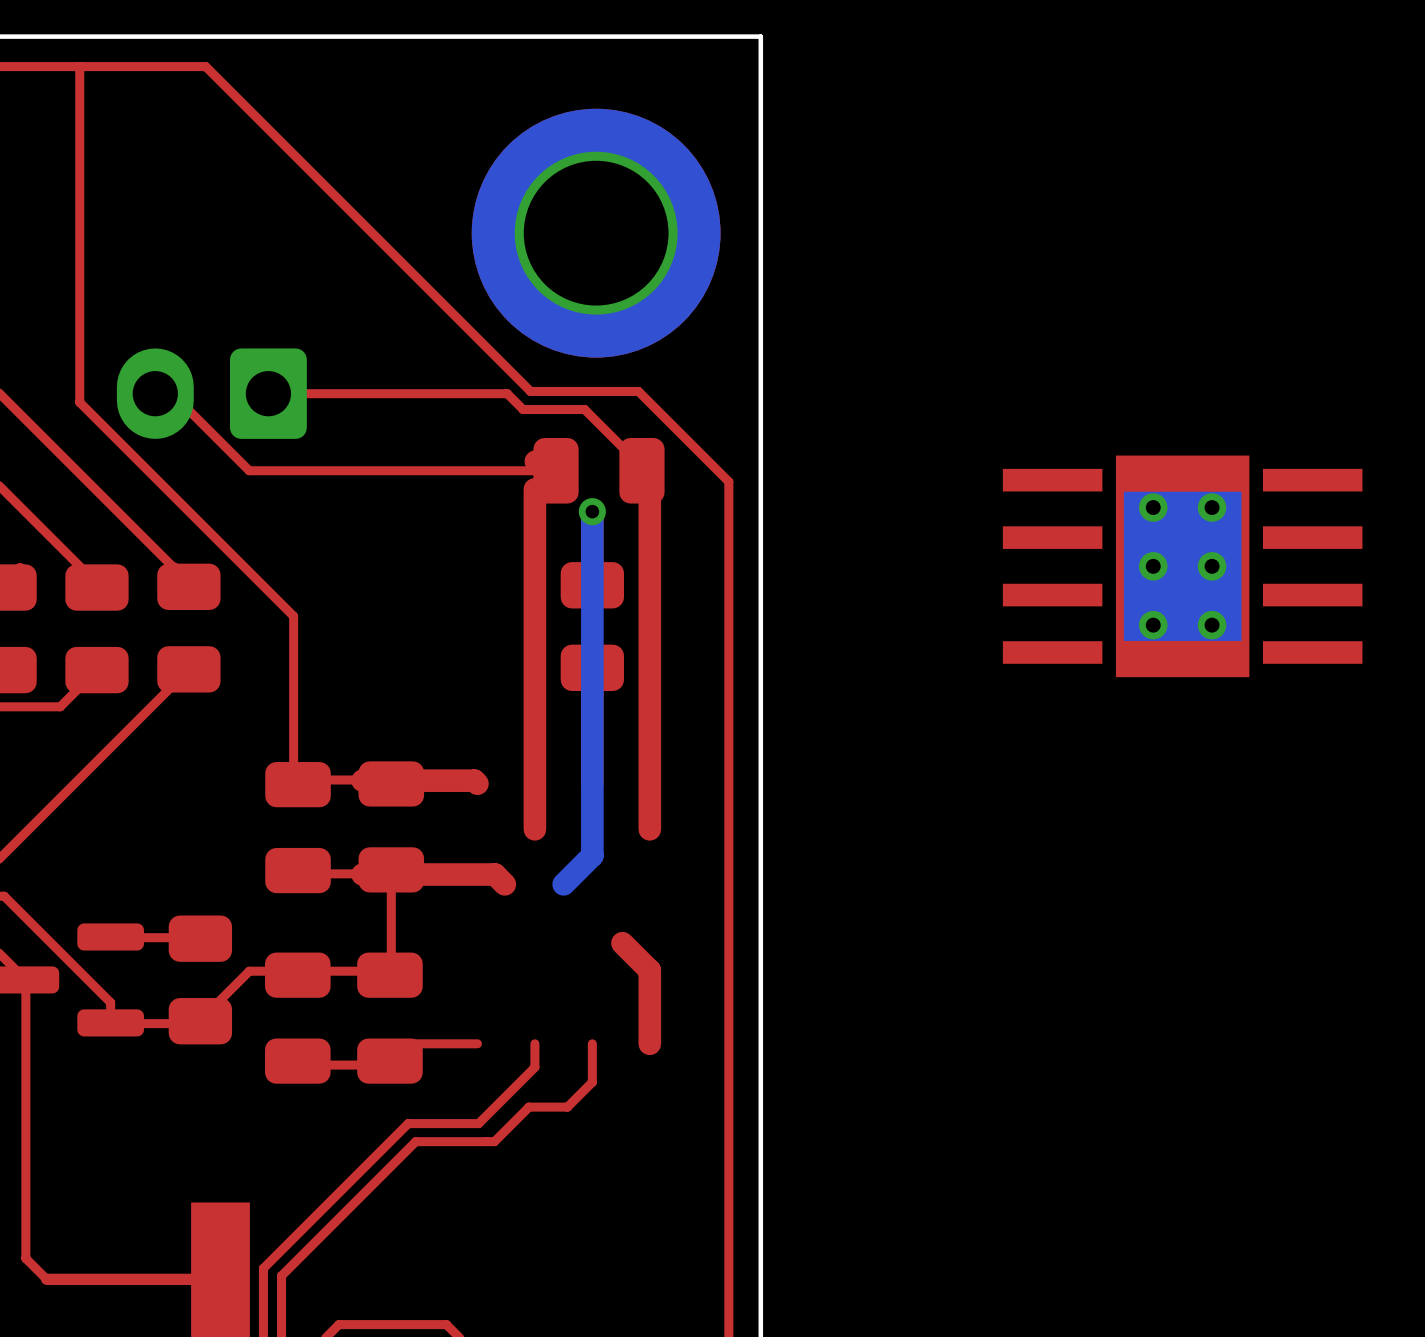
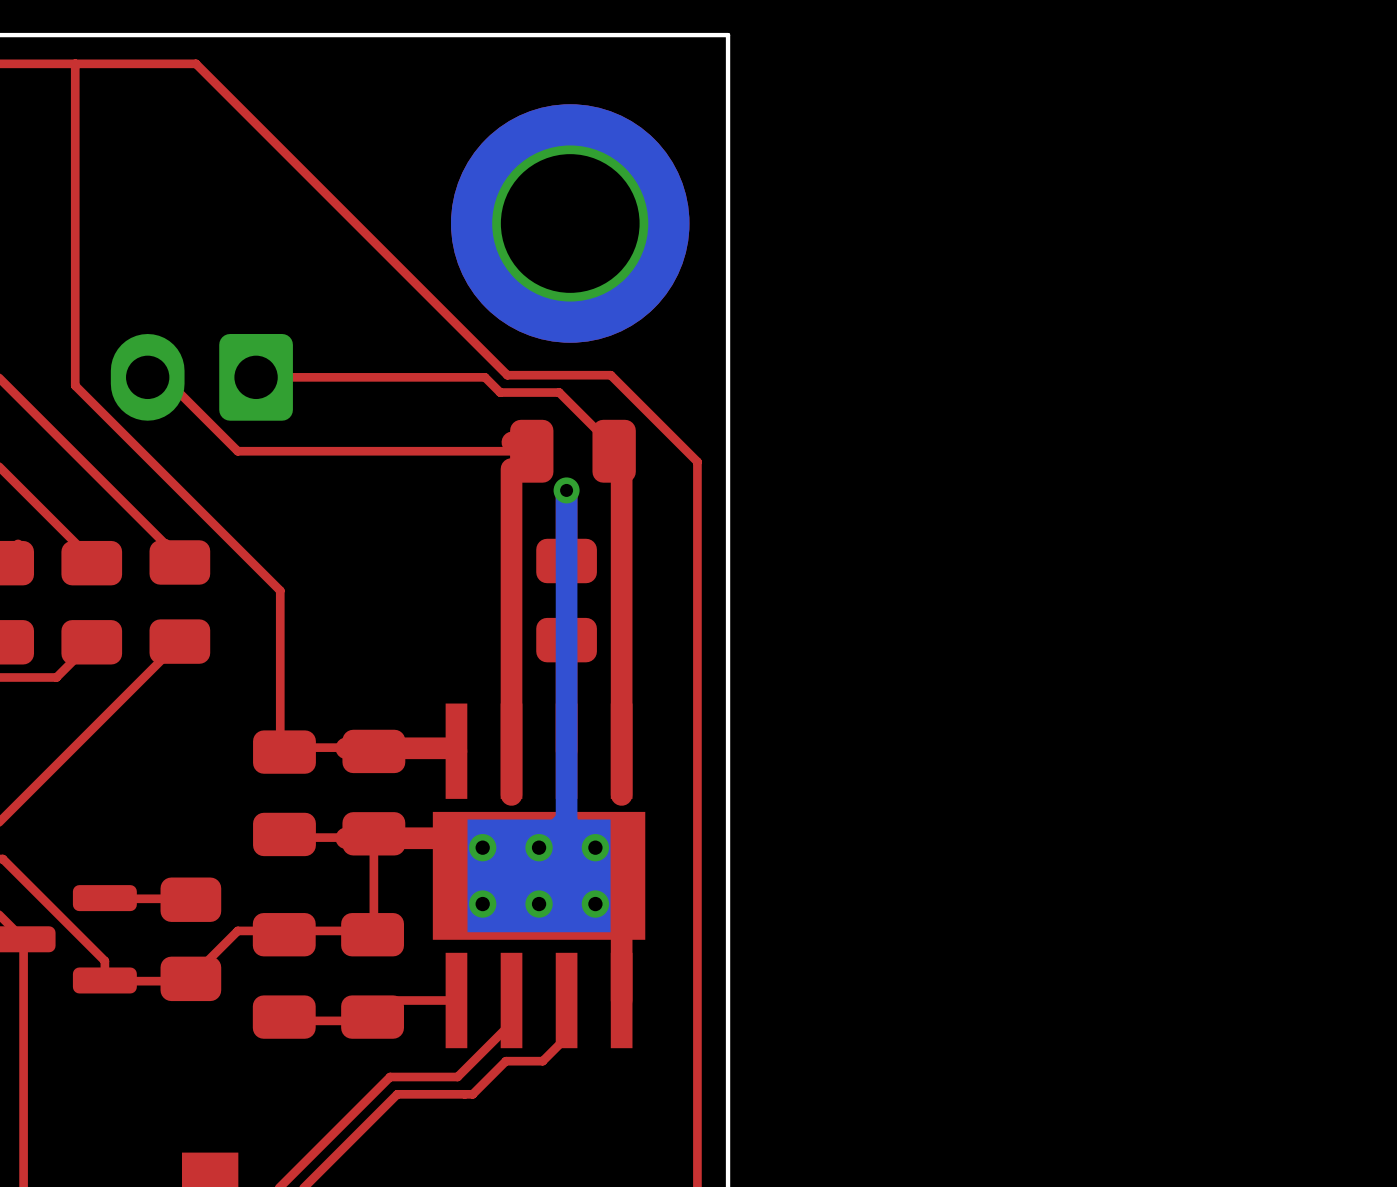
part rotation: 0° (1182, 566) -> 90° clockwise (539, 875)
part position: (1182, 566) -> (539, 875)

